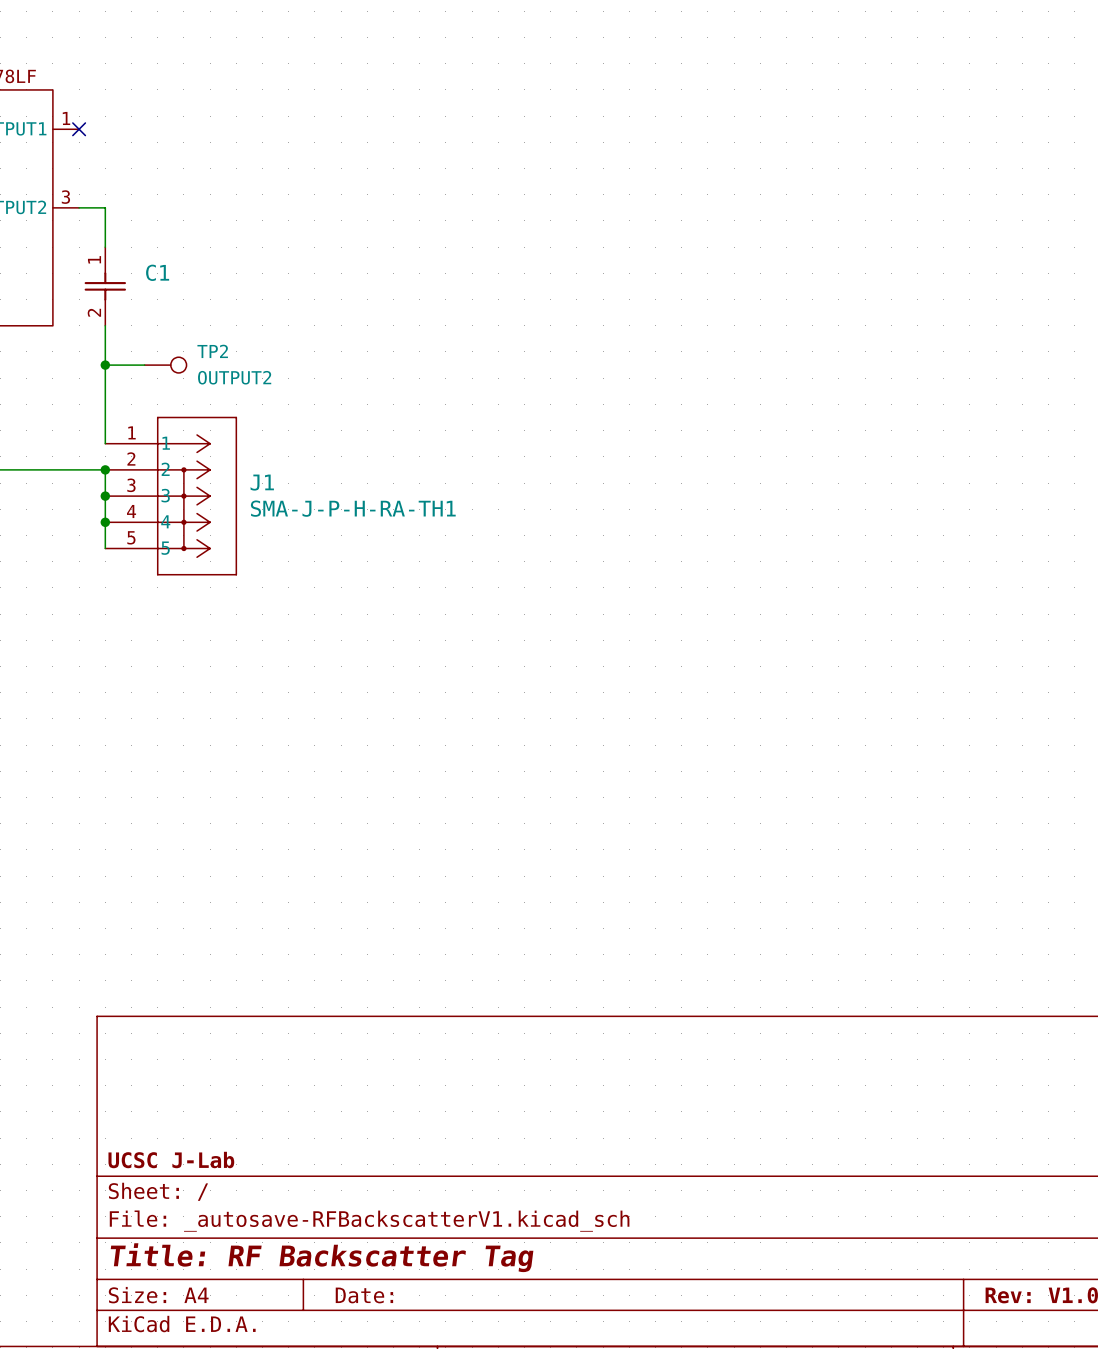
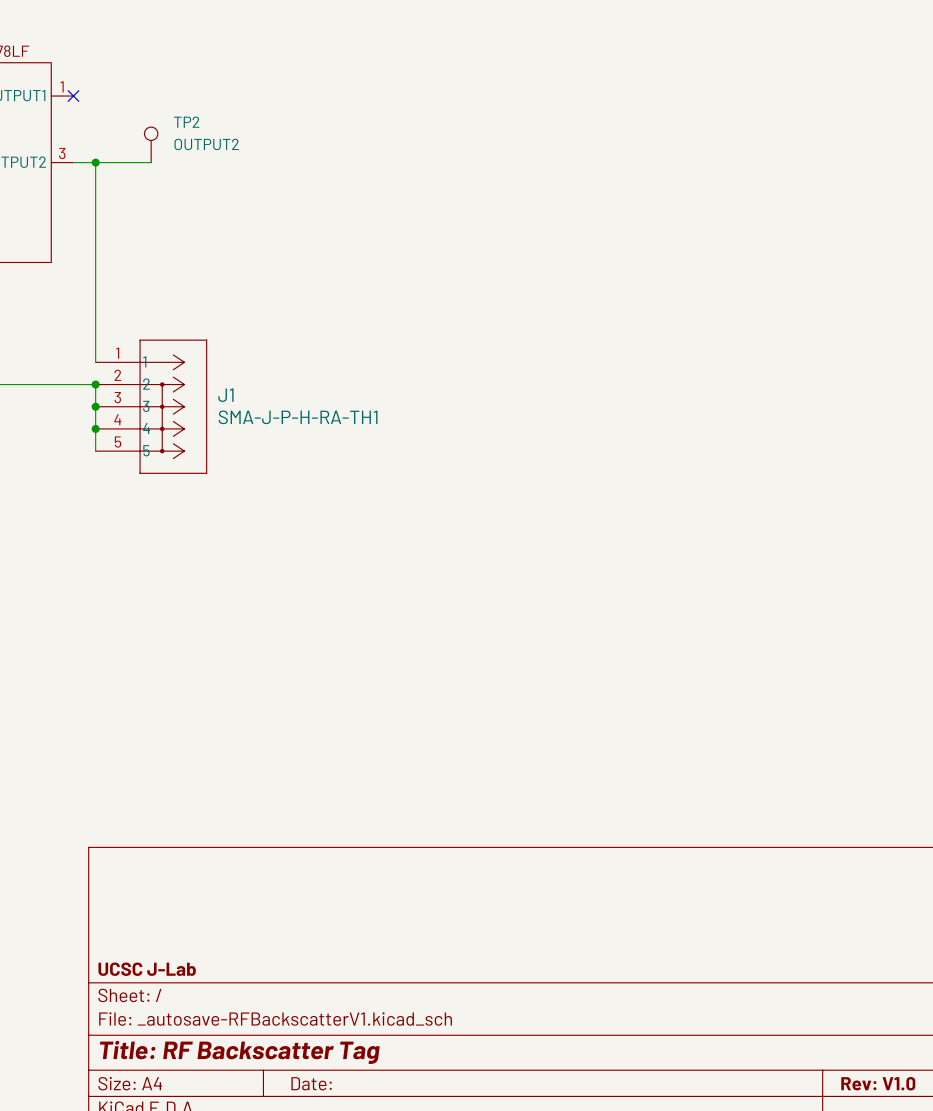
wire: none -> (95, 162) (151, 162)
junction: none -> (95, 162)
C1: (105, 286) -> none
wire: (105, 365) (144, 365) -> none
junction: (105, 365) -> none
TP2 position: (165, 365) -> (151, 144)
TP2 rotation: 0° (178, 365) -> 90° counterclockwise (151, 133)

